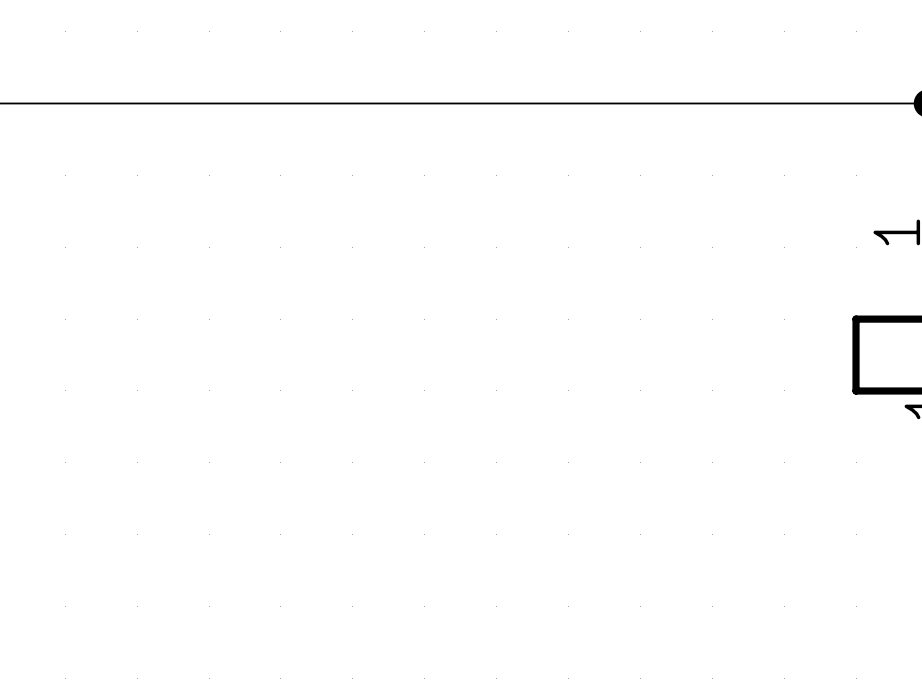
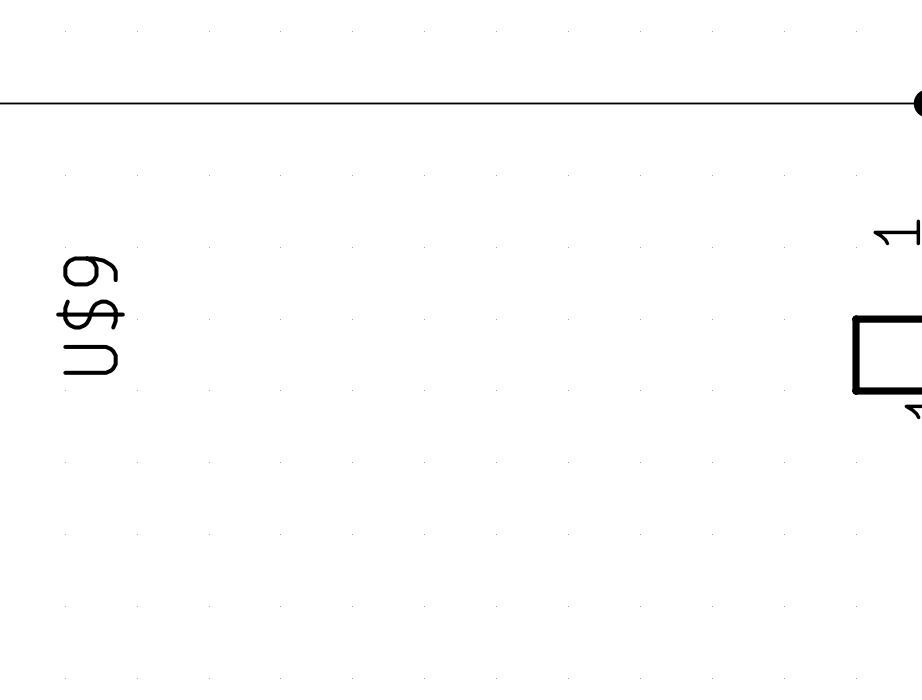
U$9 name: none -> U$9 (90, 315)

